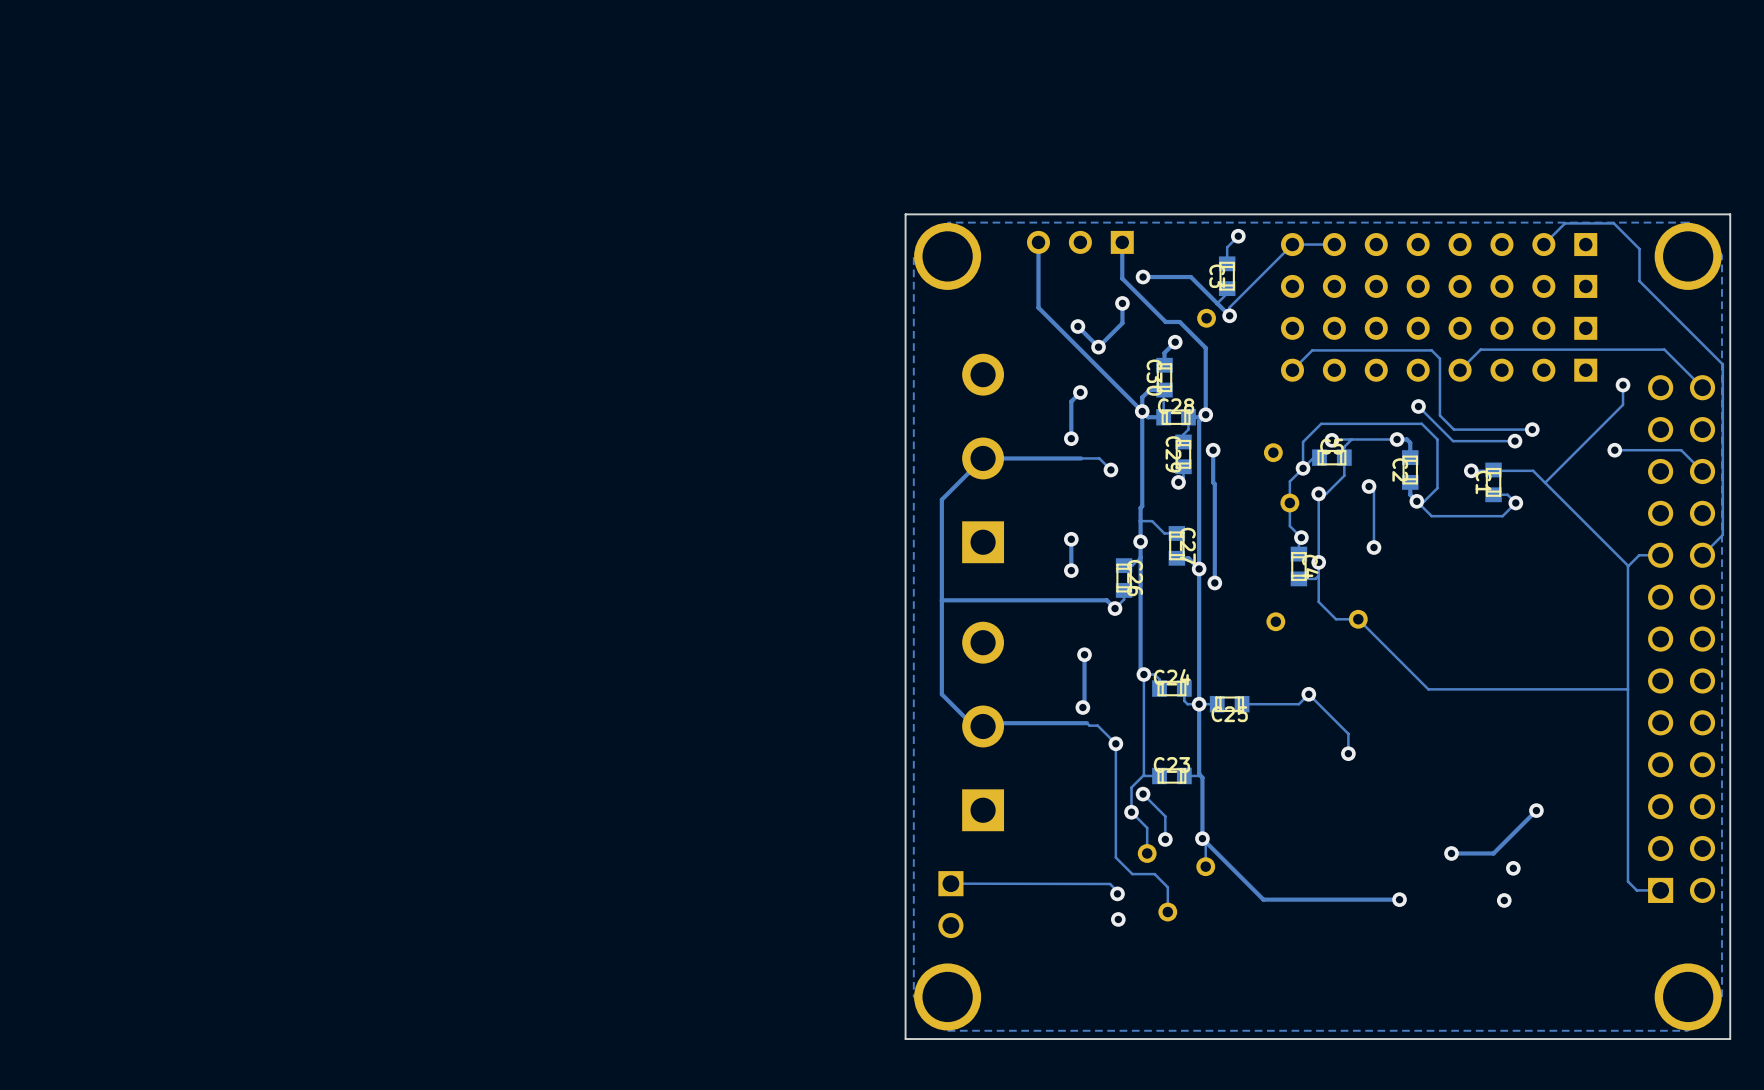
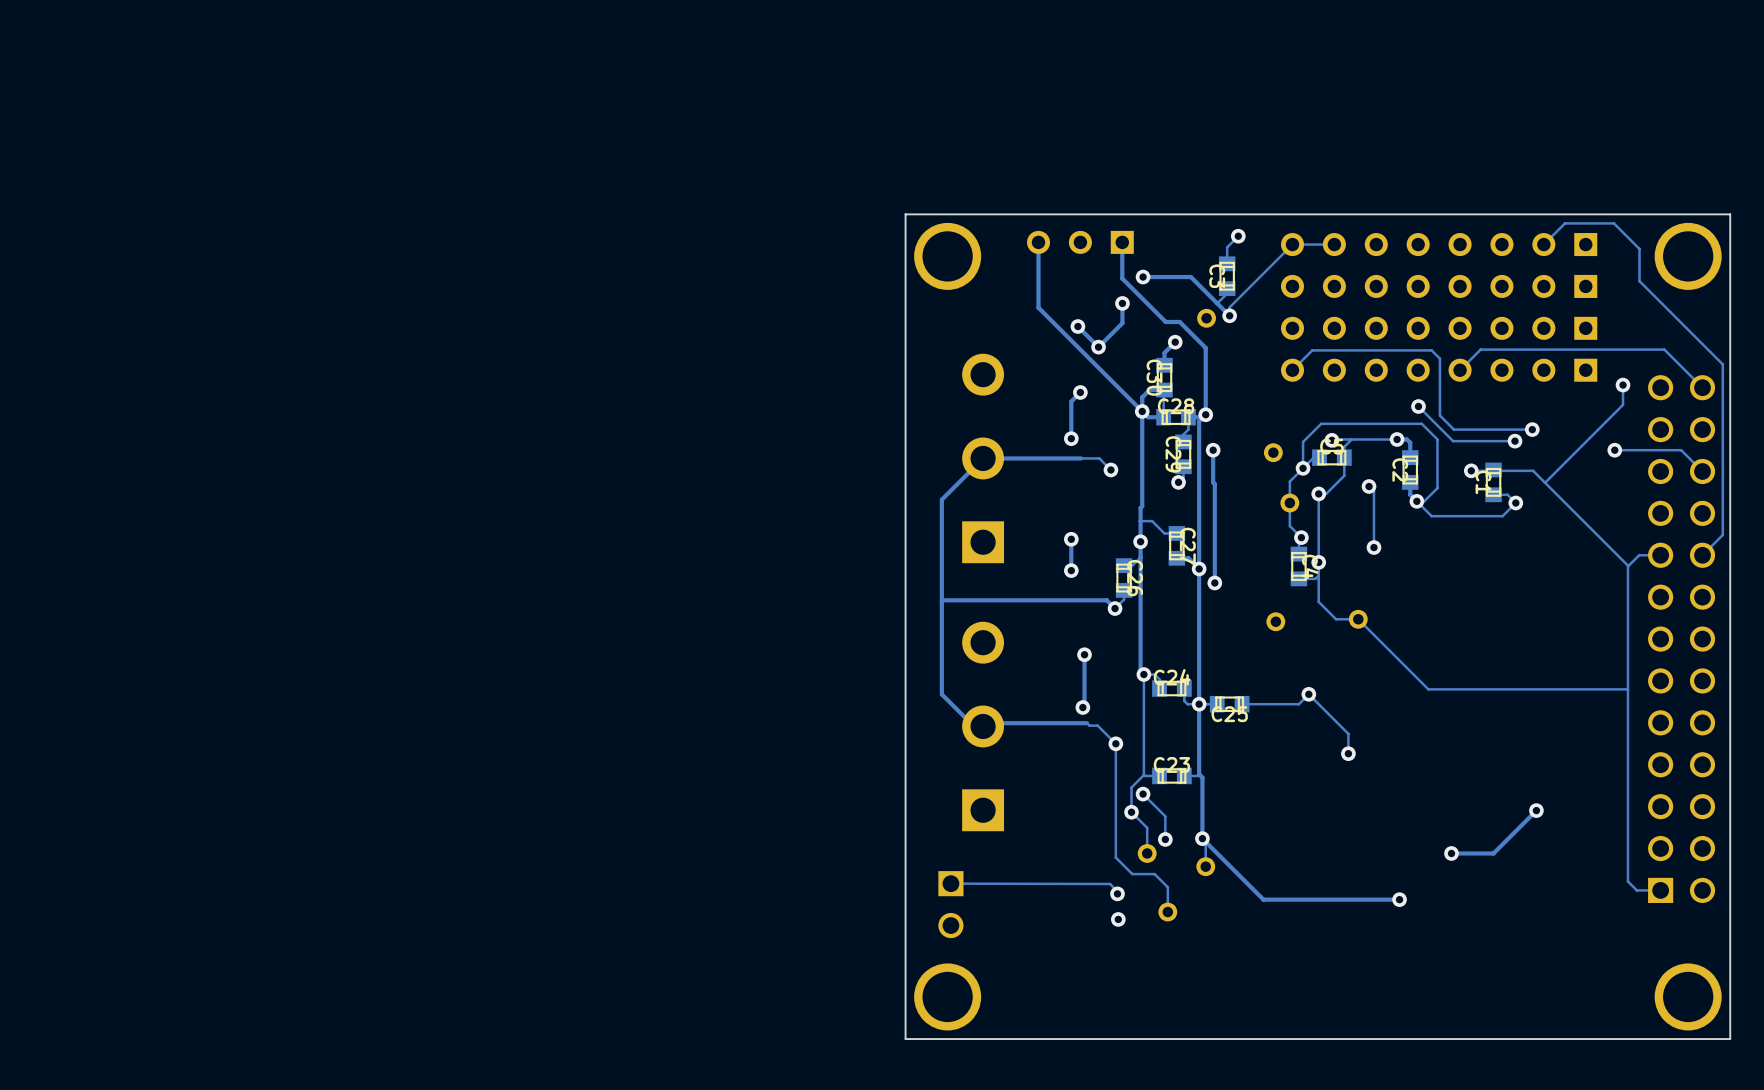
zone outline: (1689, 222) (948, 222) (913, 257) (913, 996) (947, 1030) (1688, 1030) (1721, 996) (1721, 254) (1689, 222) -> none
via: (1513, 868) -> none
via: (1504, 900) -> none

